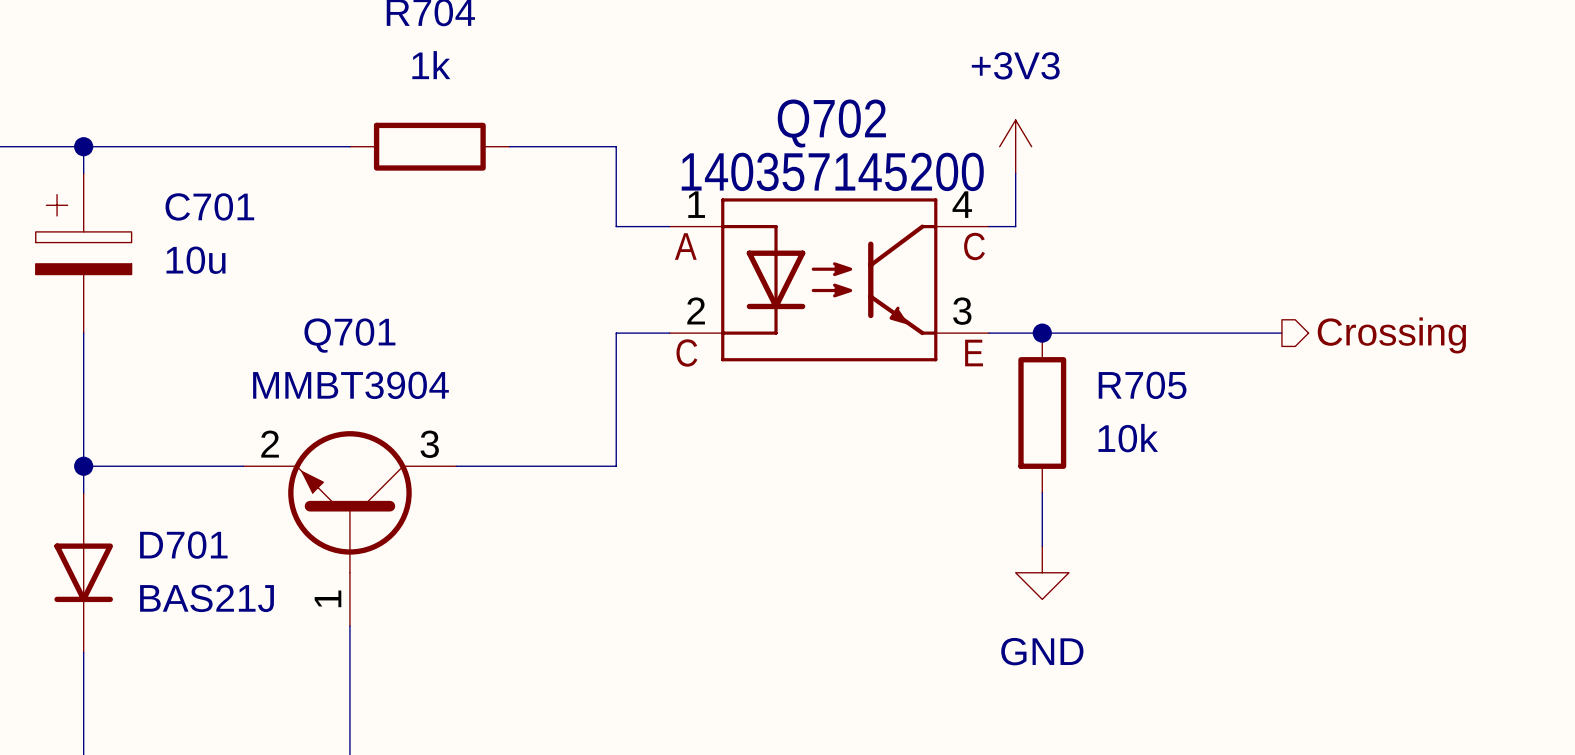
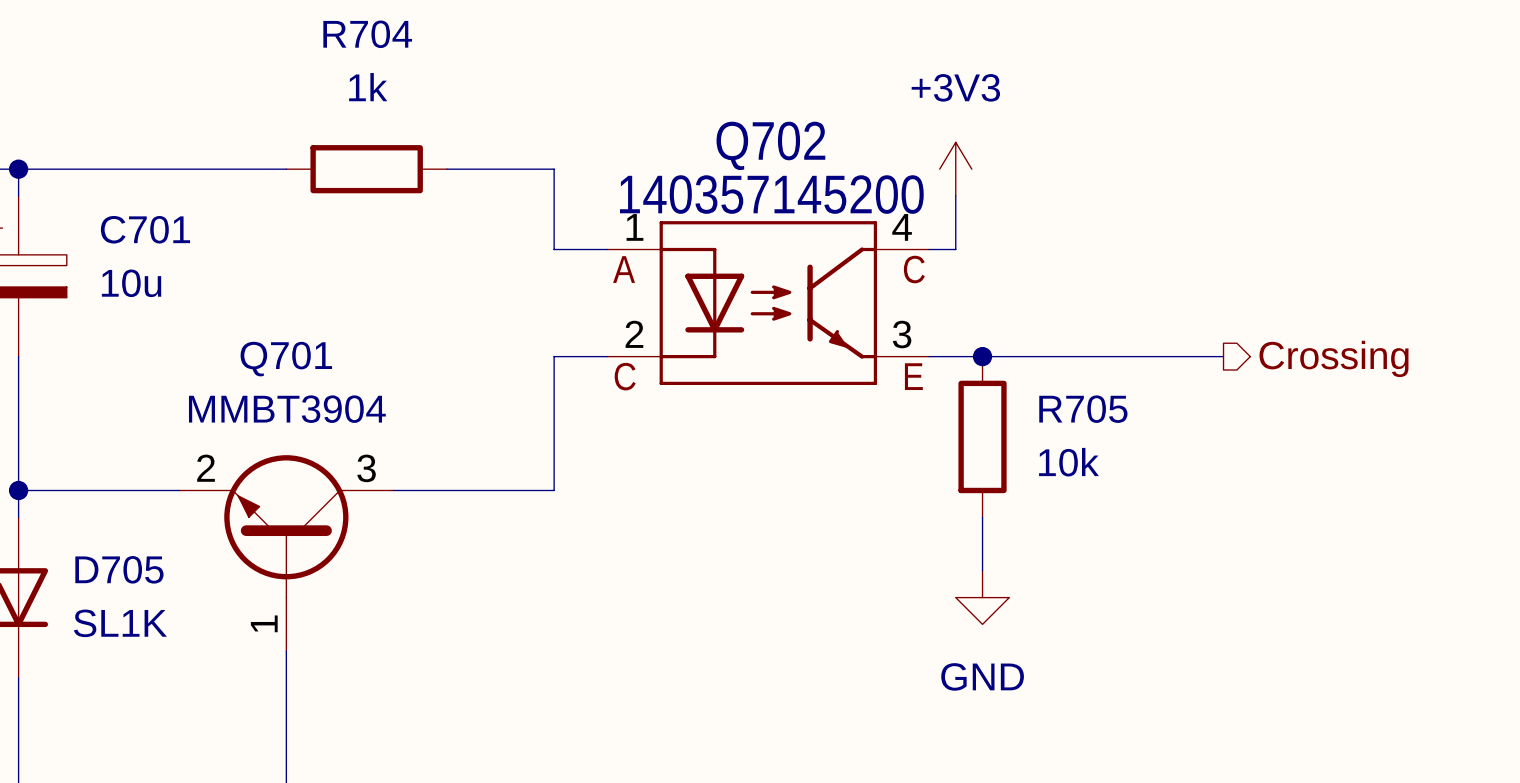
D701 name: D701 (183, 545) -> D705 (119, 569)
D701 value: BAS21J (207, 598) -> SL1K (120, 623)

